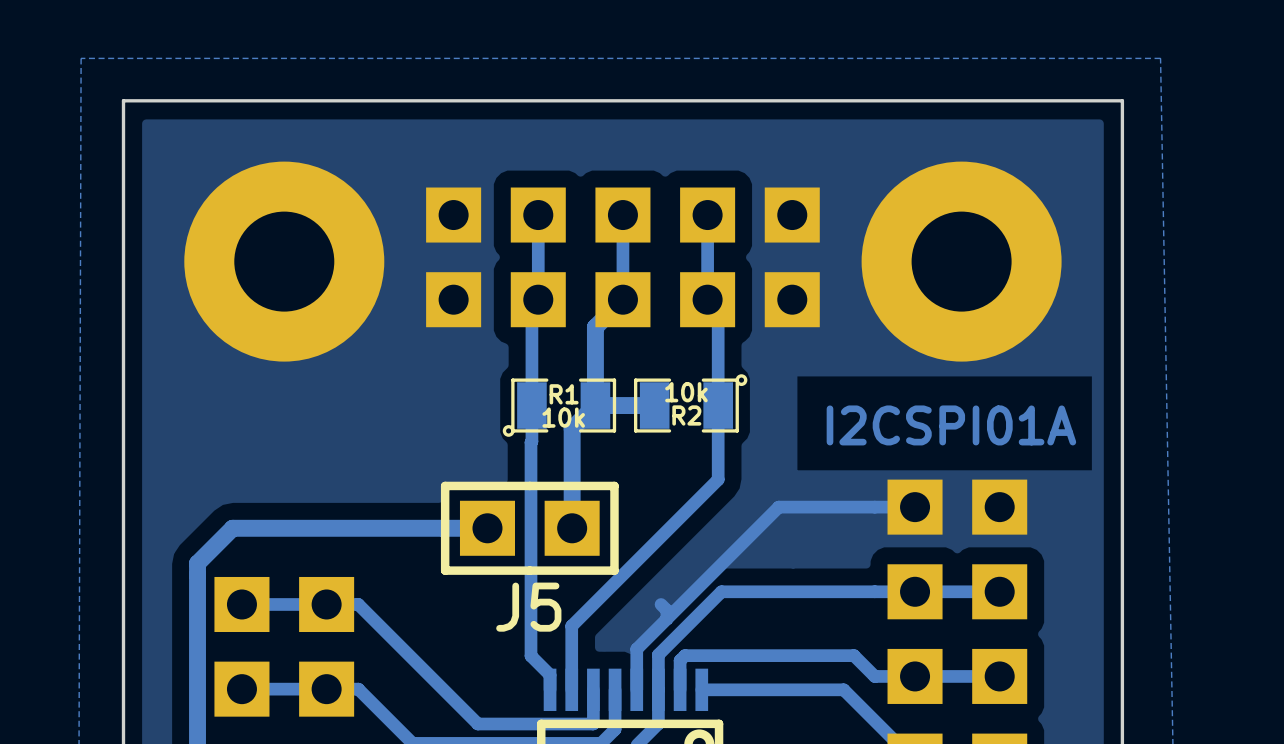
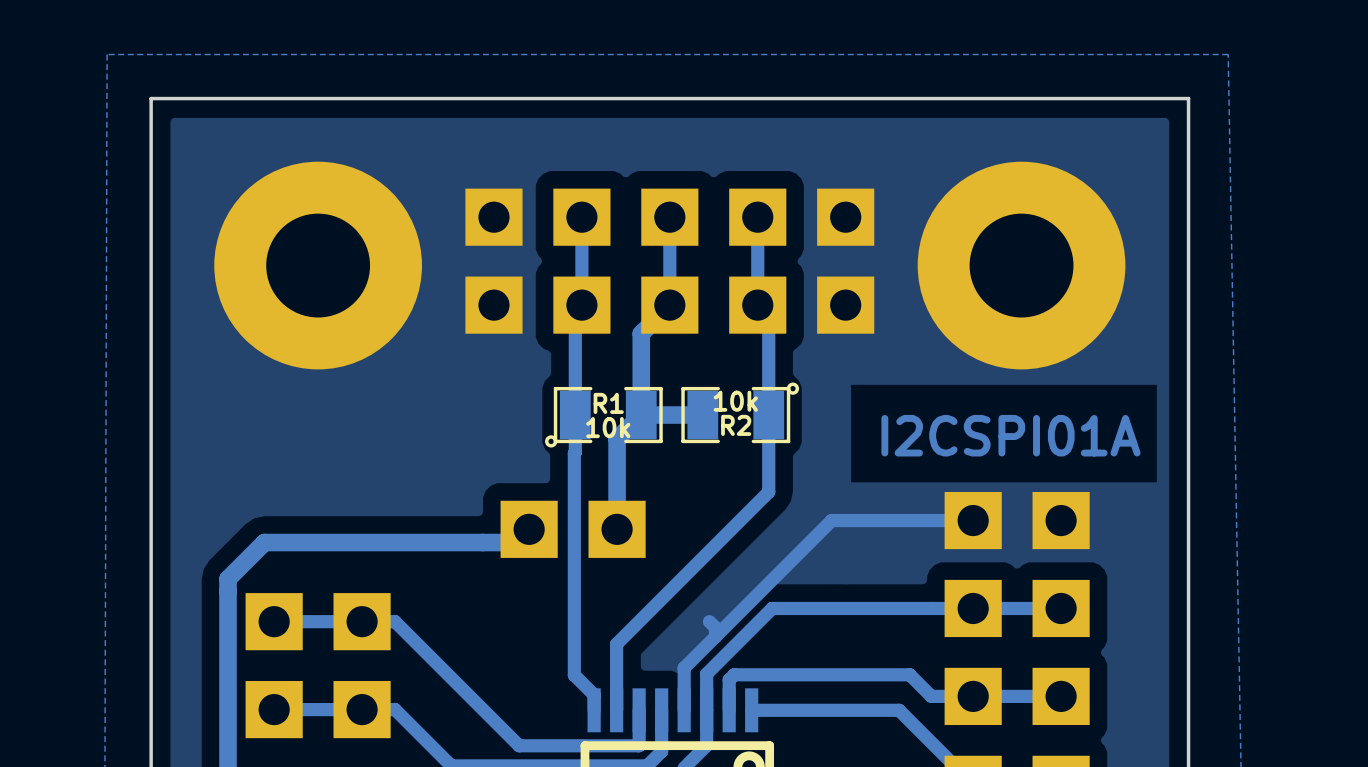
J5 side: bottom (529, 528) -> top (573, 529)

